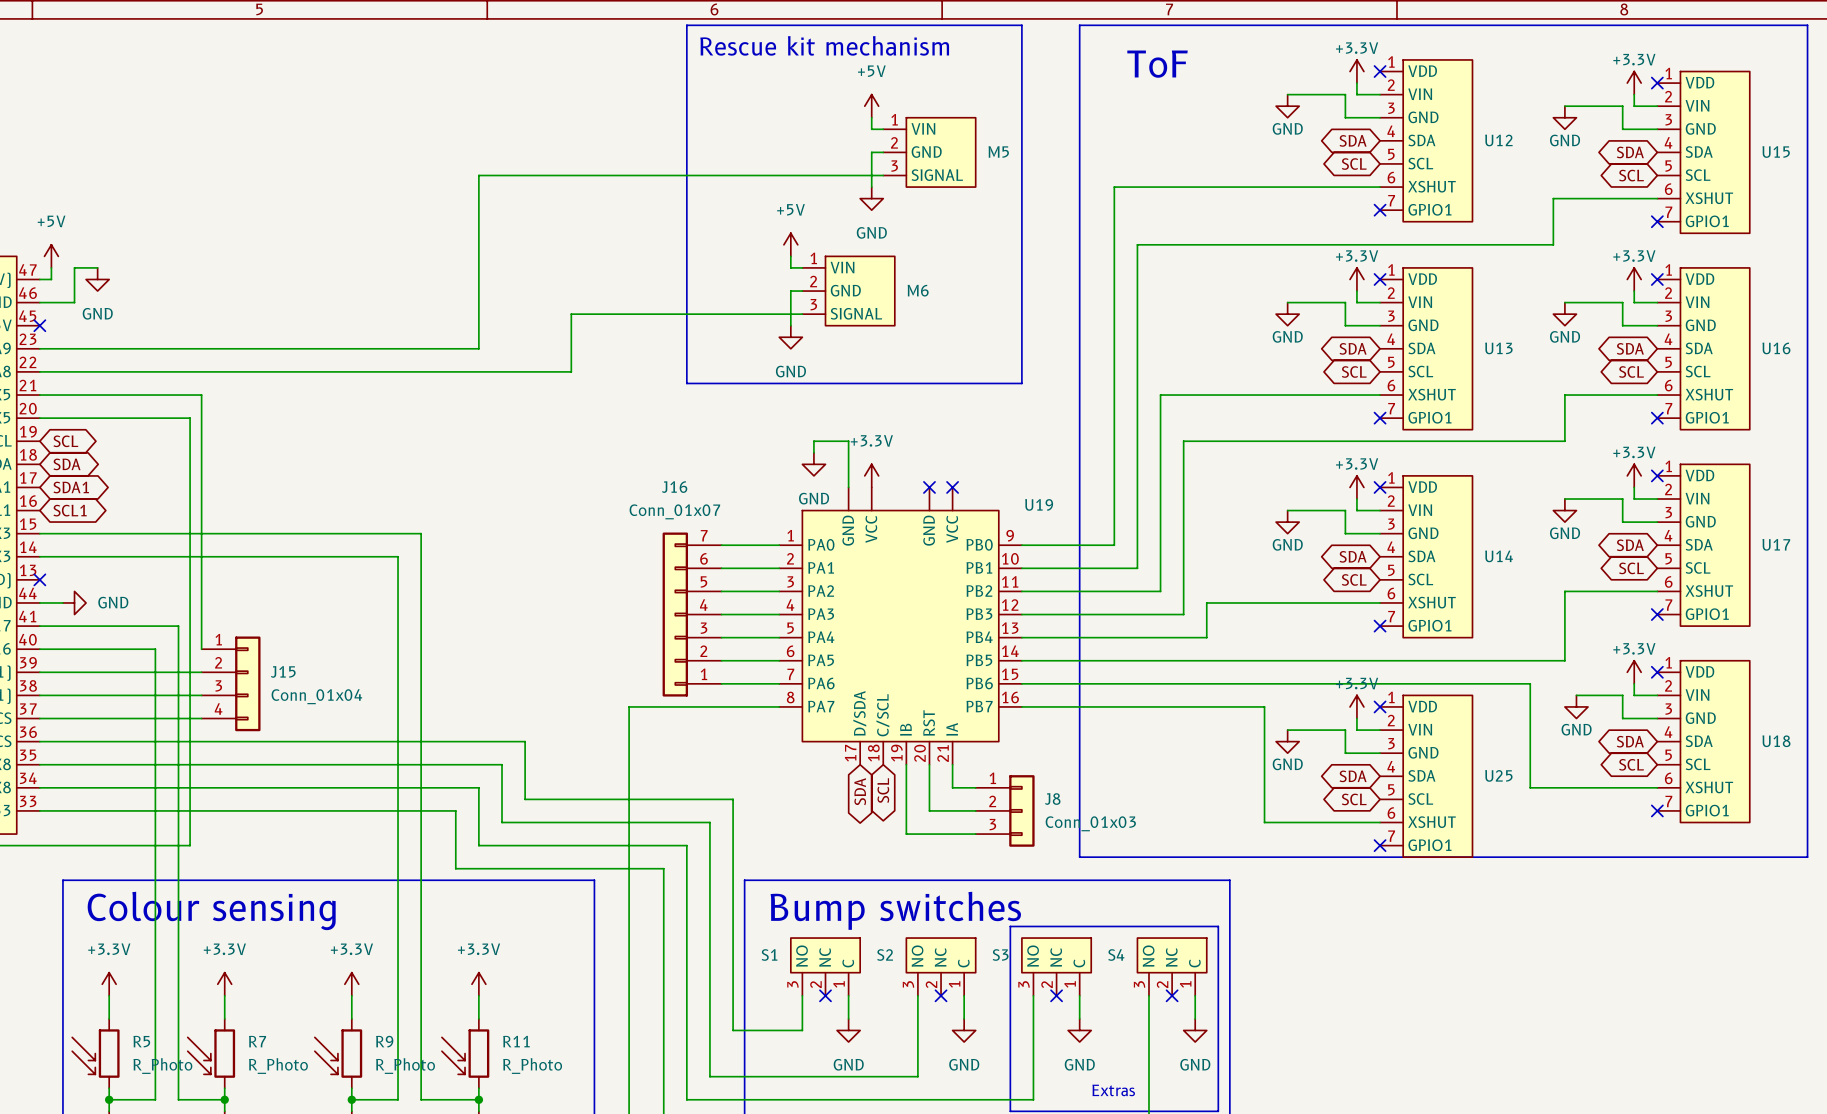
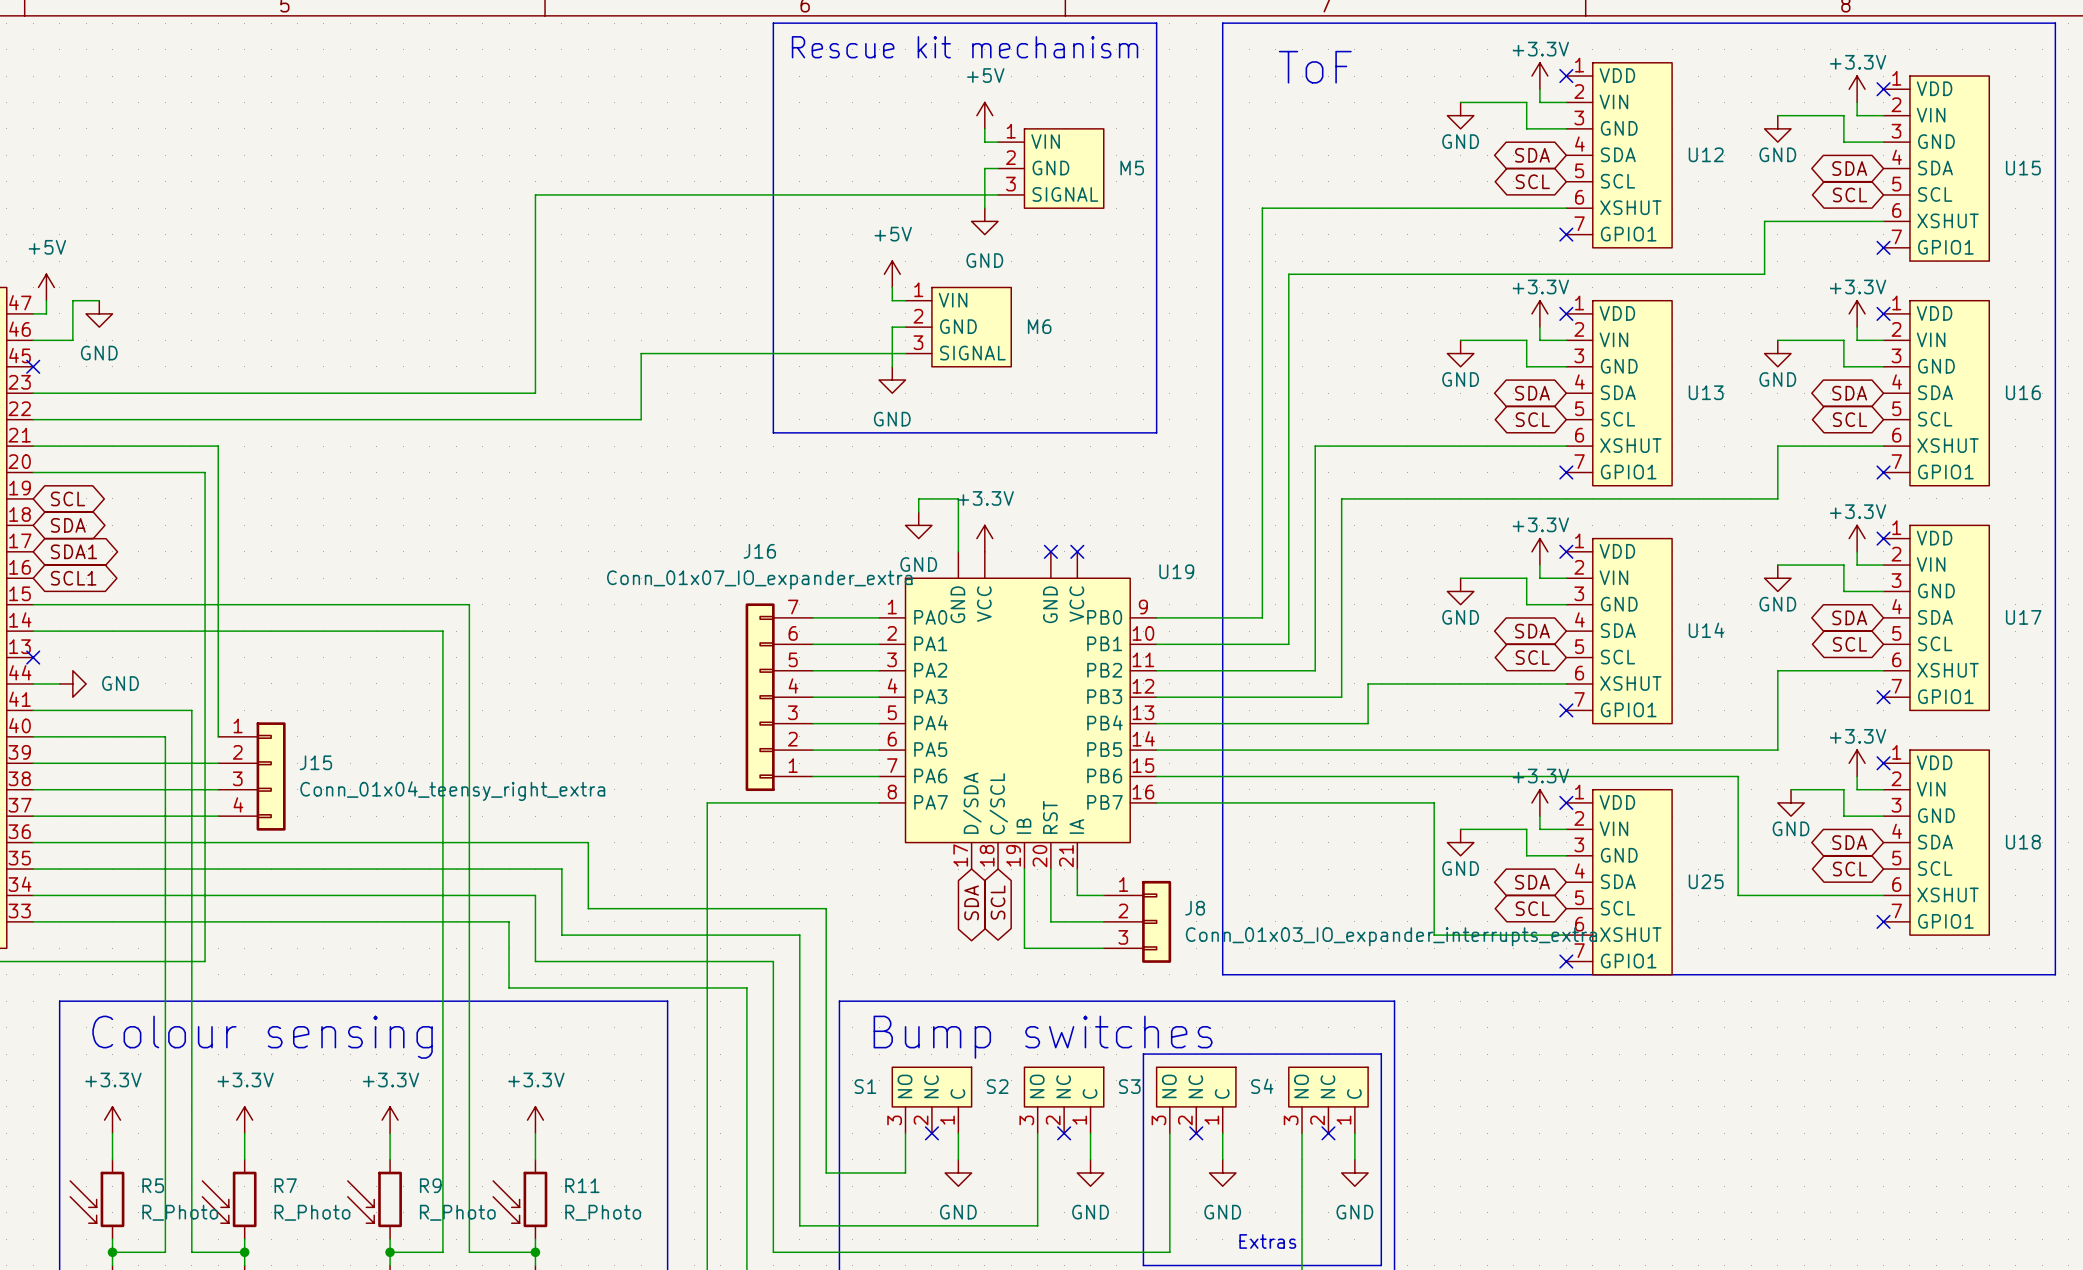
J16 value: Conn_01x07 (674, 511) -> Conn_01x07_IO_expander_extra (759, 579)
J15 value: Conn_01x04 (316, 696) -> Conn_01x04_teensy_right_extra (452, 791)
J8 value: Conn_01x03 (1090, 823) -> Conn_01x03_IO_expander_interrupts_extra (1391, 936)

